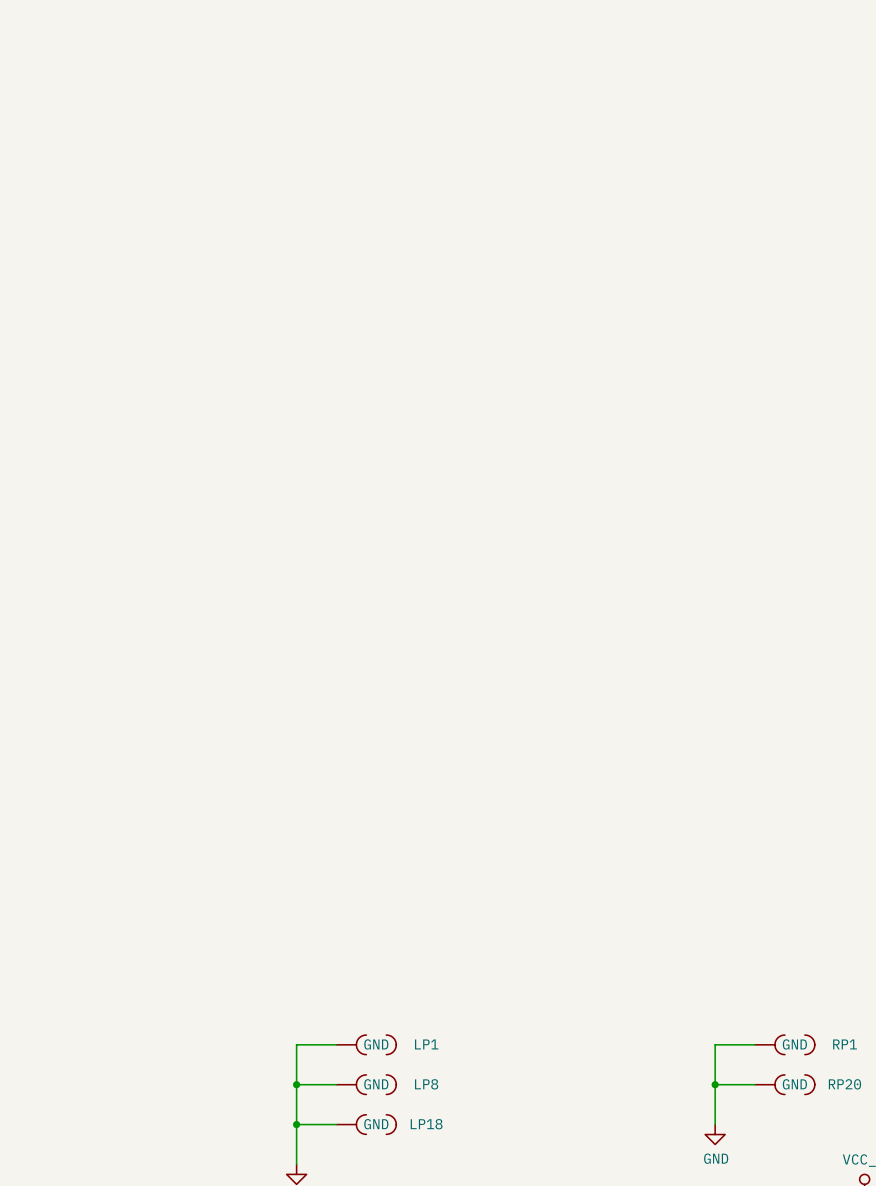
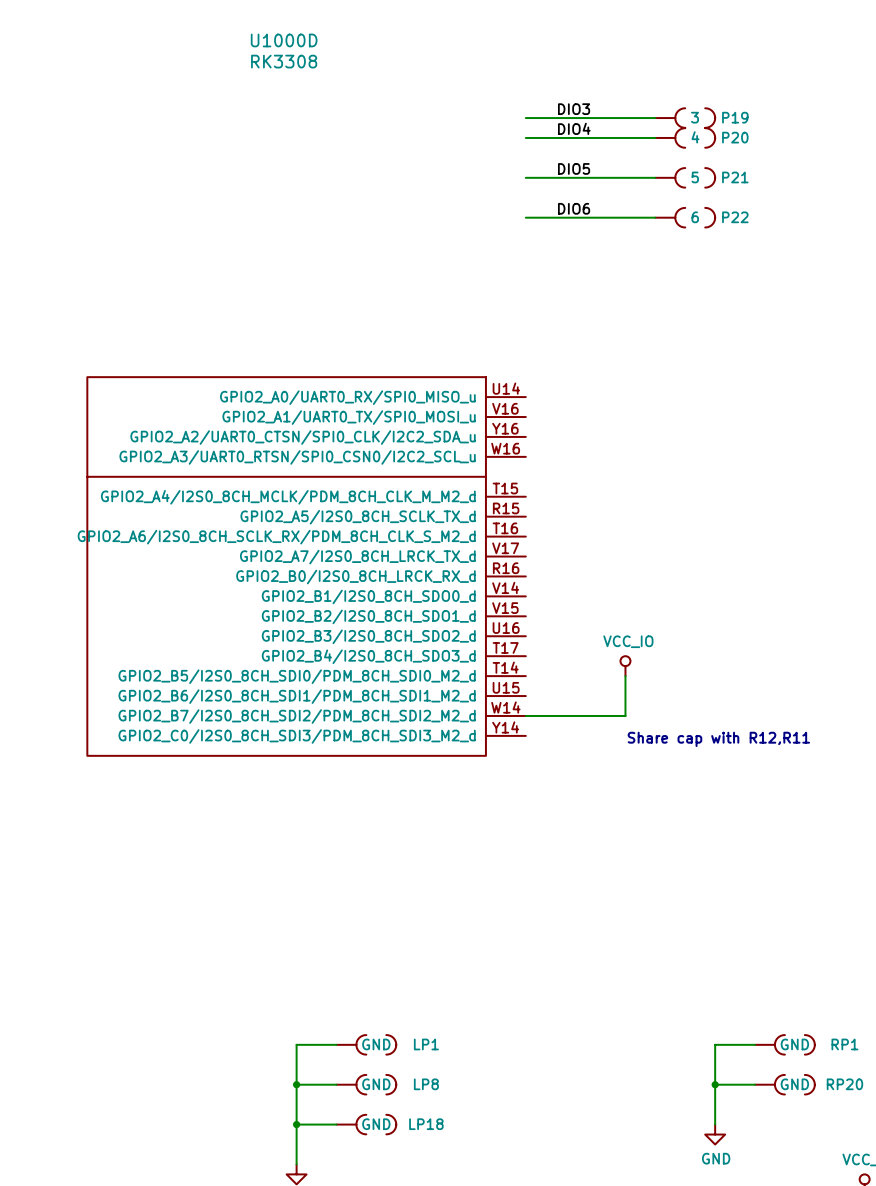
label: none -> DIO3 (574, 109)
wire: none -> (525, 118) (655, 118)
P19: none -> 3 (685, 118)
label: none -> DIO4 (574, 128)
wire: none -> (525, 137) (655, 137)
P20: none -> 4 (685, 137)
label: none -> DIO5 (574, 168)
wire: none -> (525, 177) (655, 177)
P21: none -> 5 (685, 177)
label: none -> DIO6 (574, 208)
wire: none -> (525, 217) (655, 217)
P22: none -> 6 (685, 217)
U1000D: none -> RK3308 (306, 566)
power symbol: none -> VCC_IO (625, 666)
wire: none -> (625, 676) (625, 715) (525, 715)
text: none -> Share cap with R12,R11 (718, 739)

